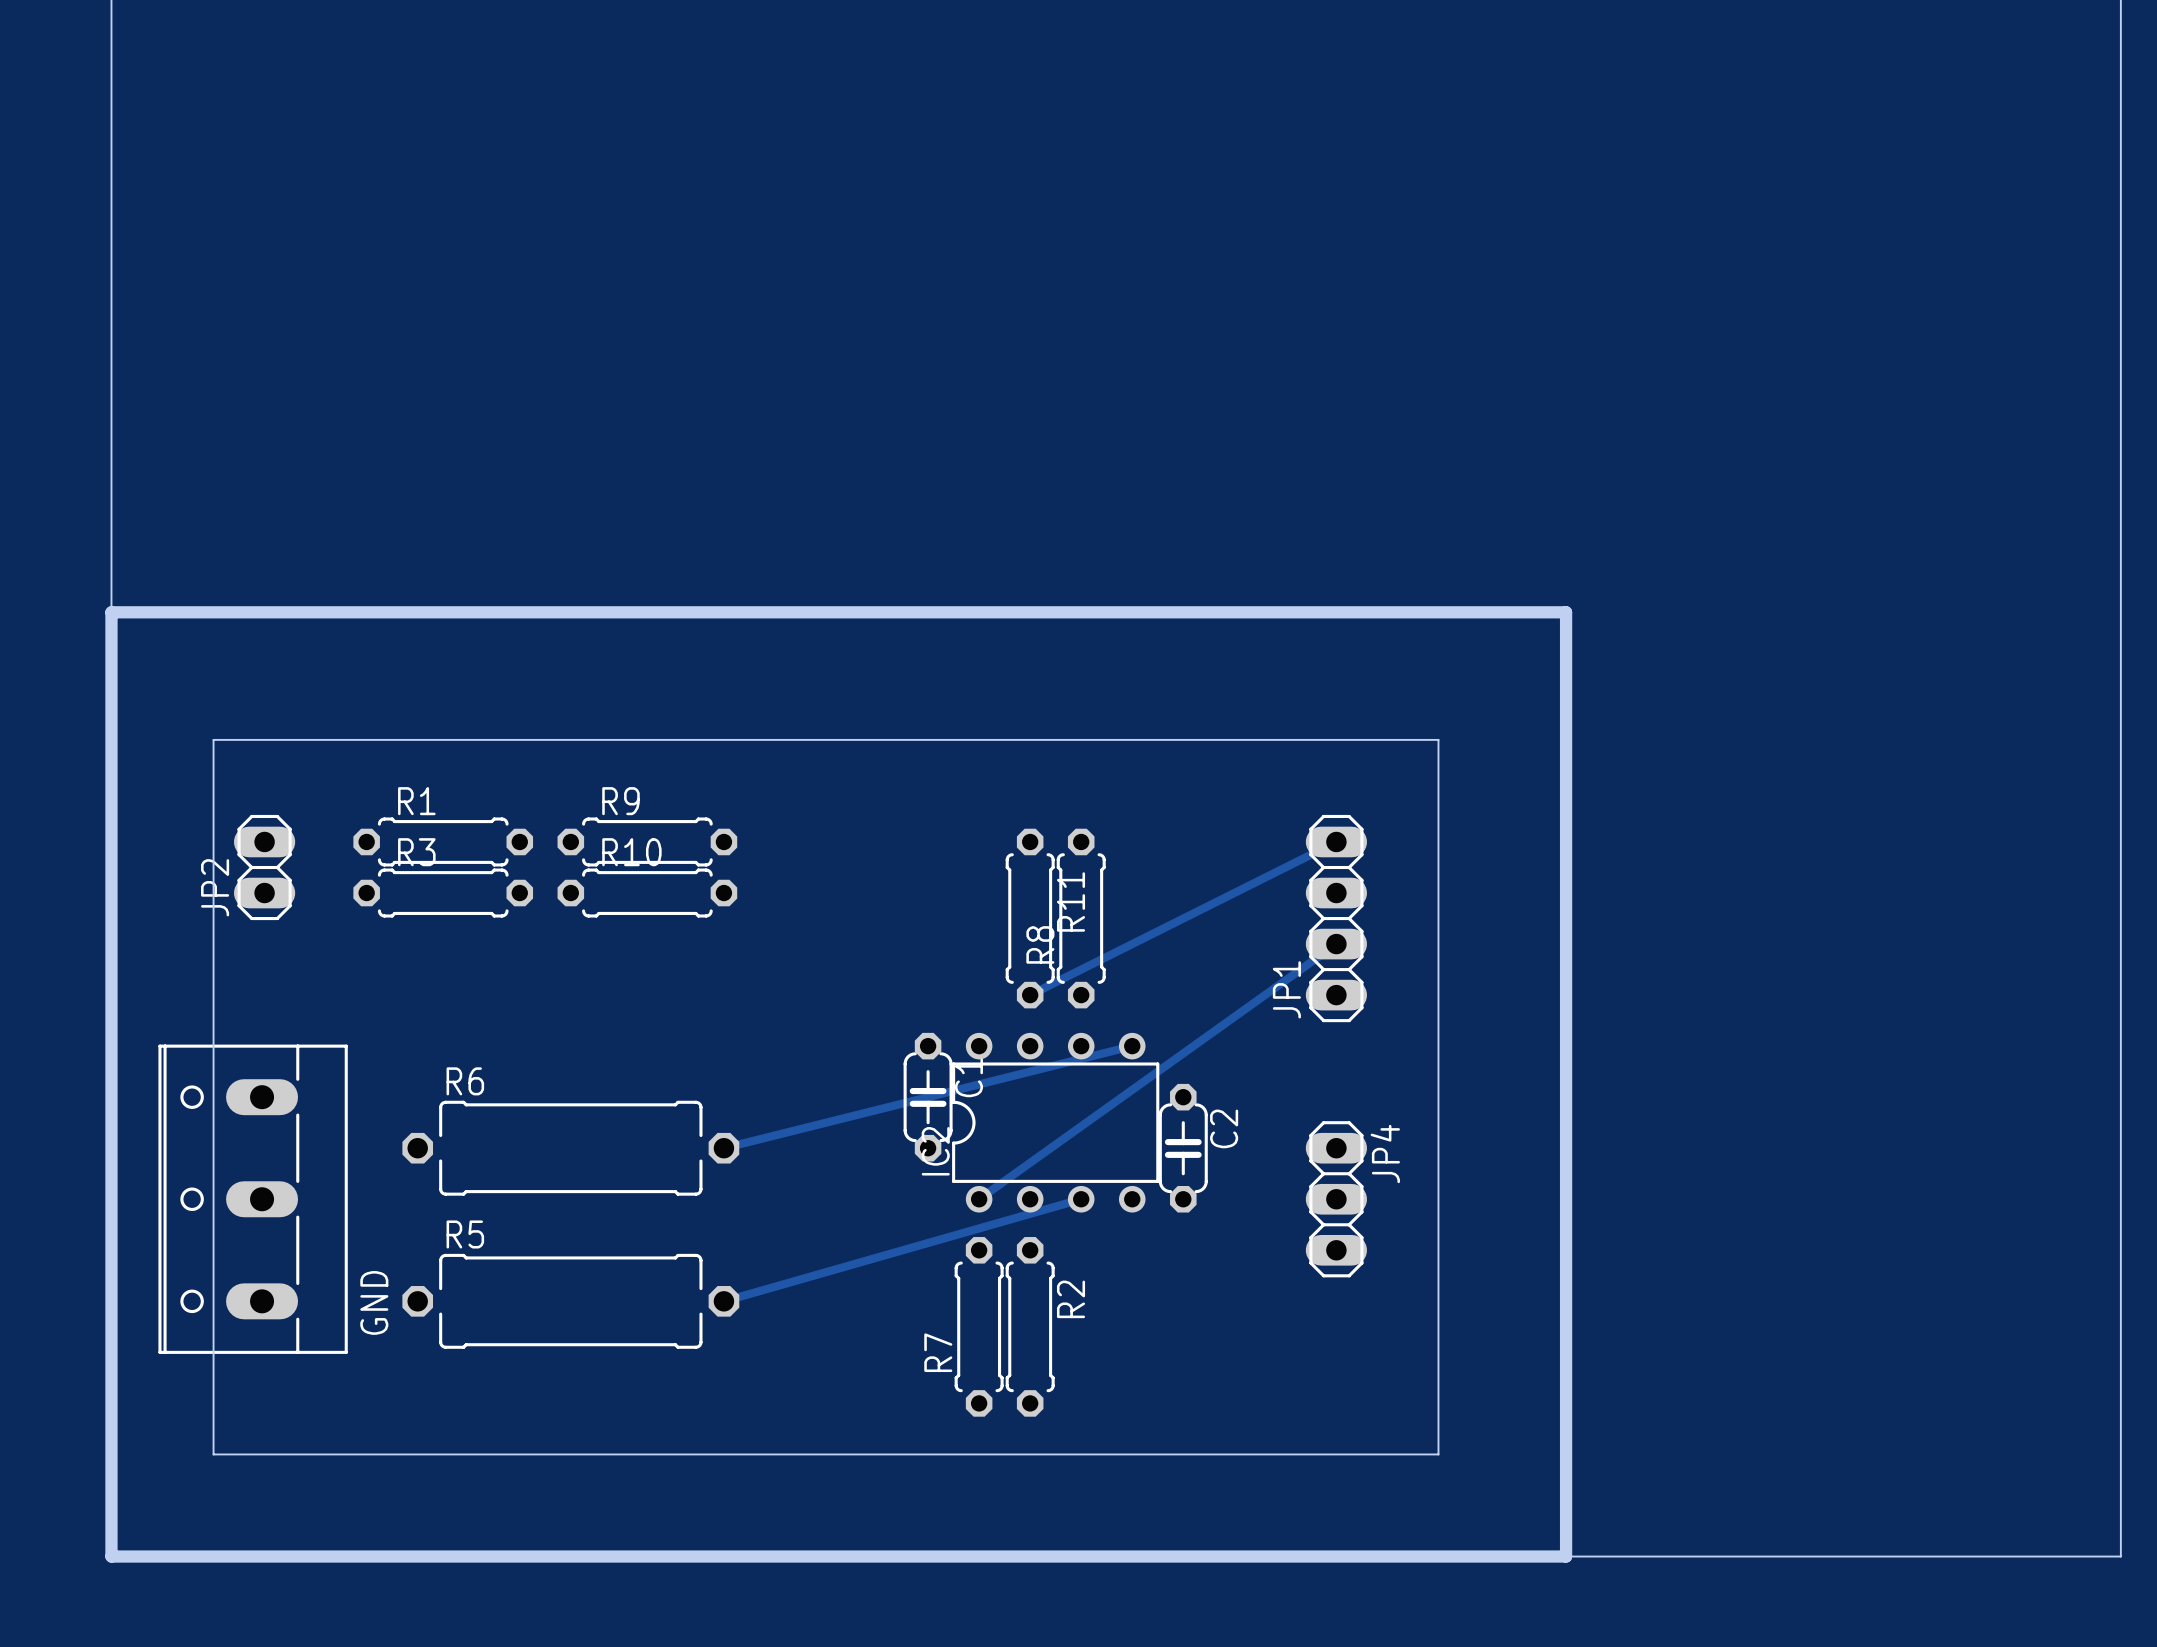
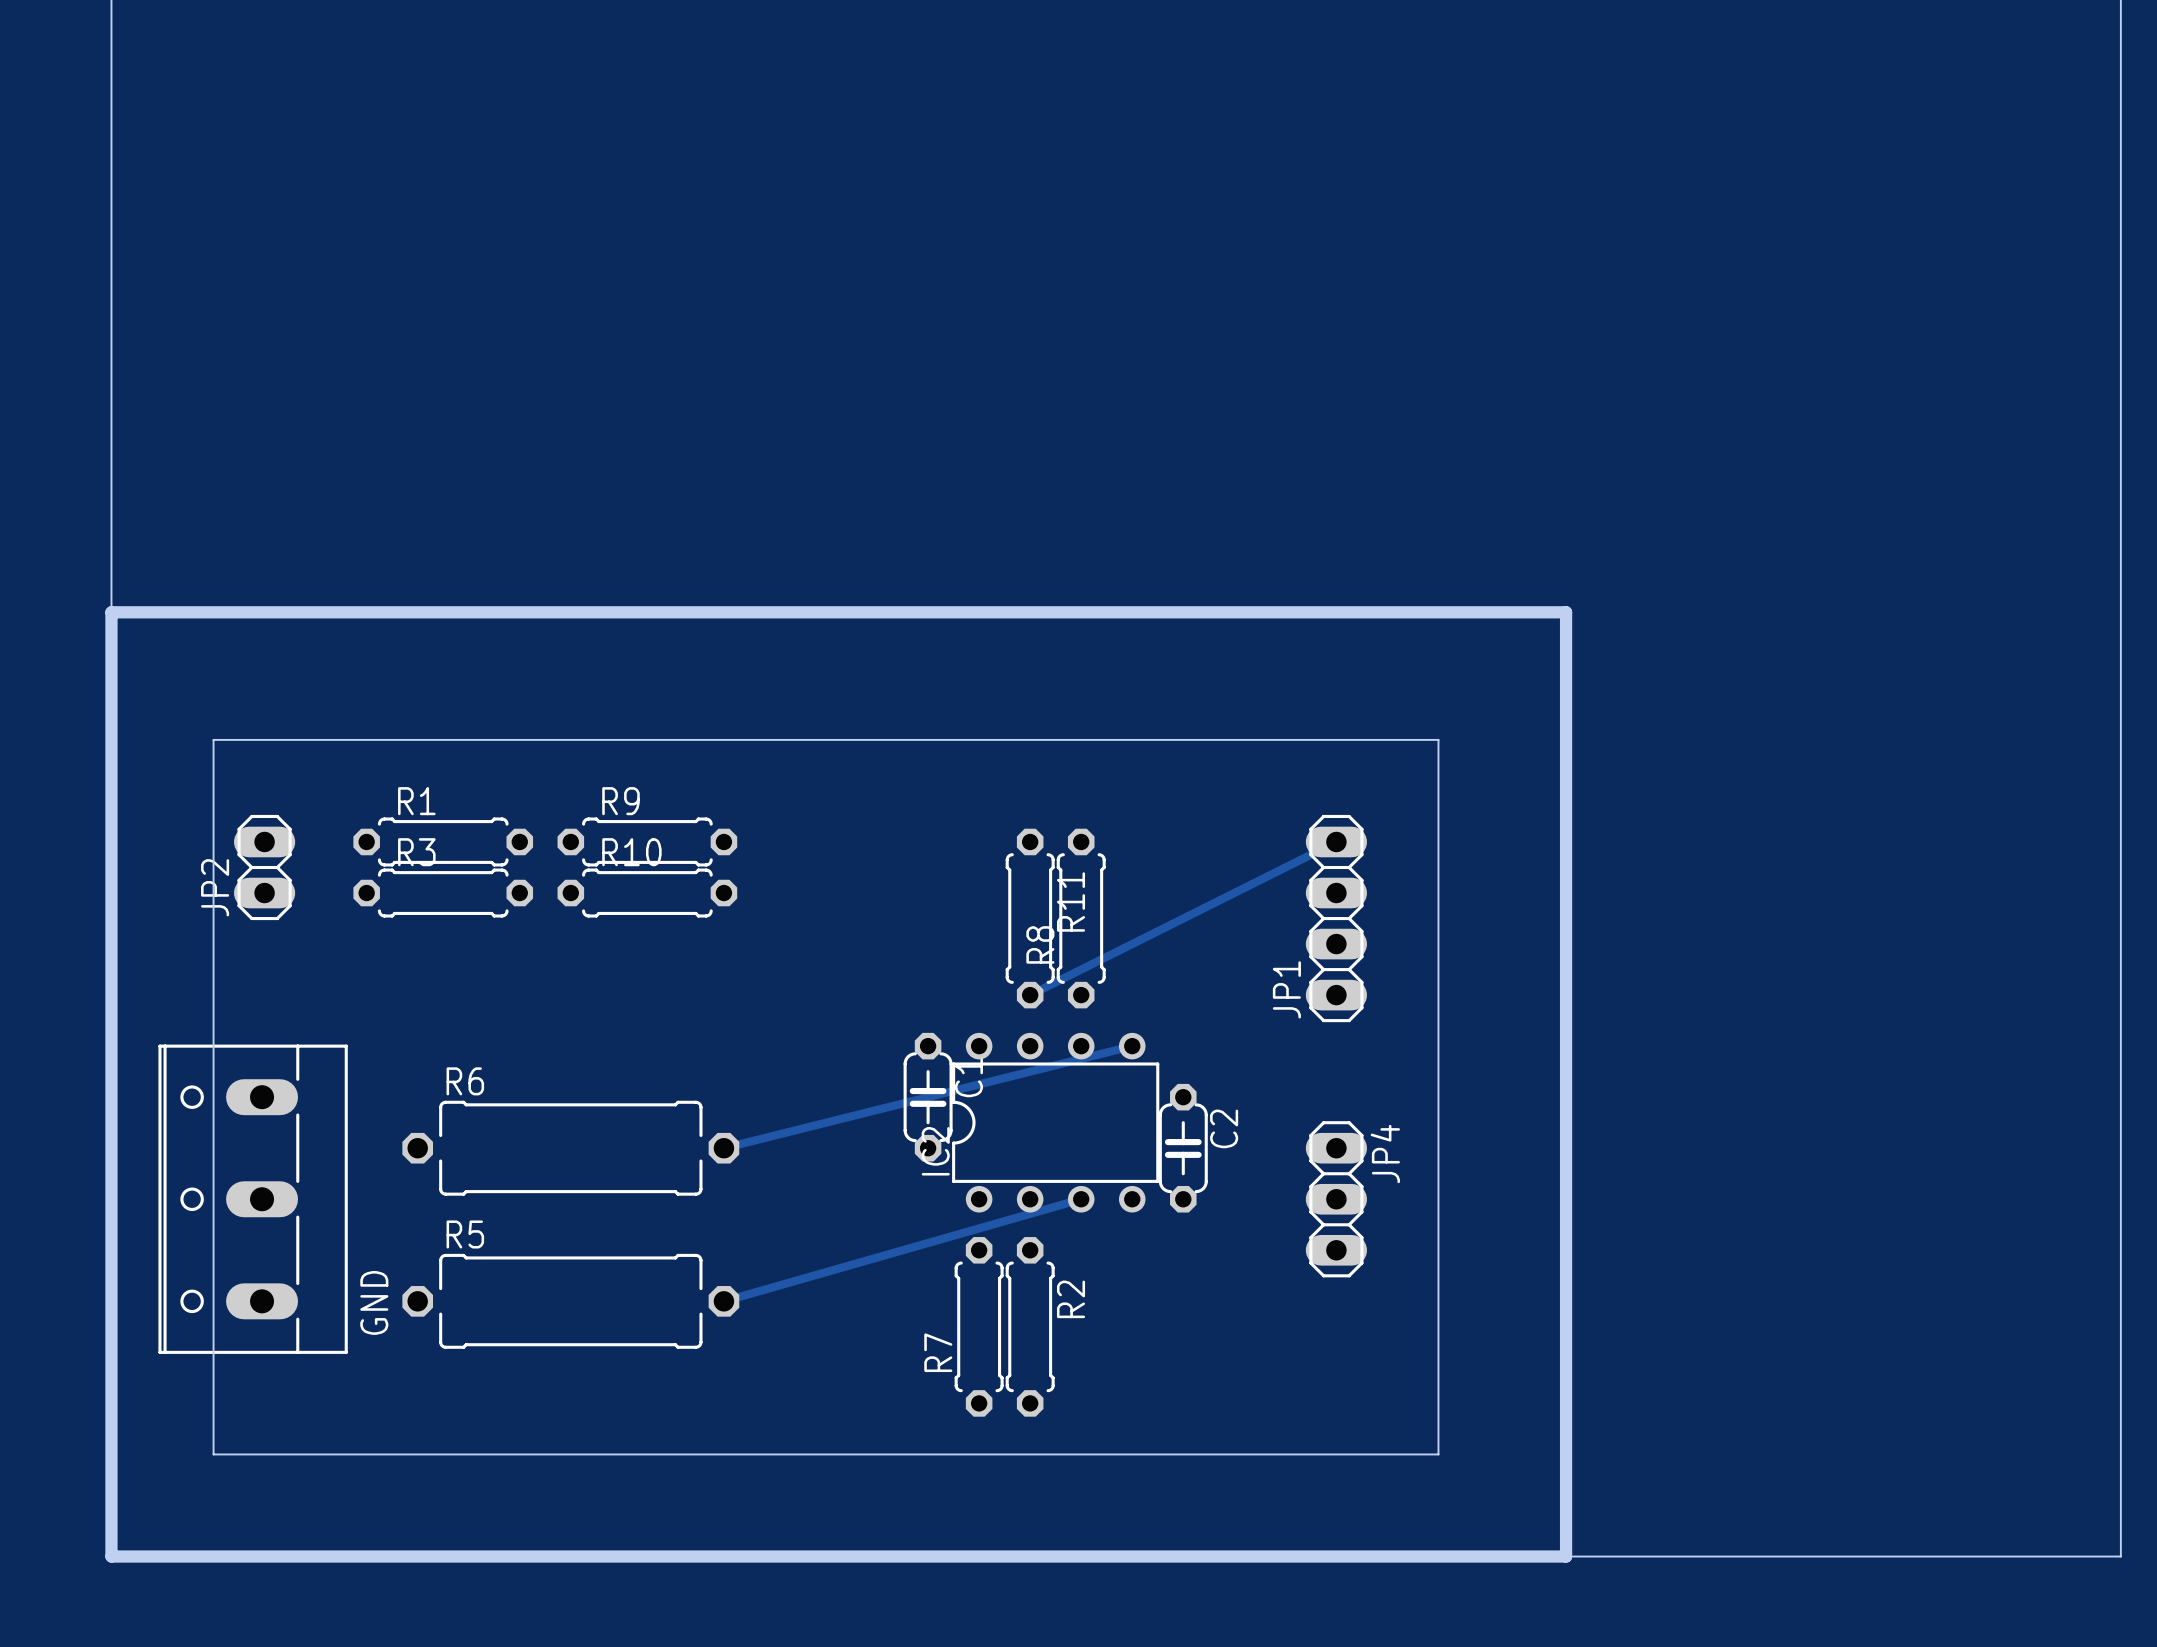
track: (1336, 944) (979, 1199) -> none

